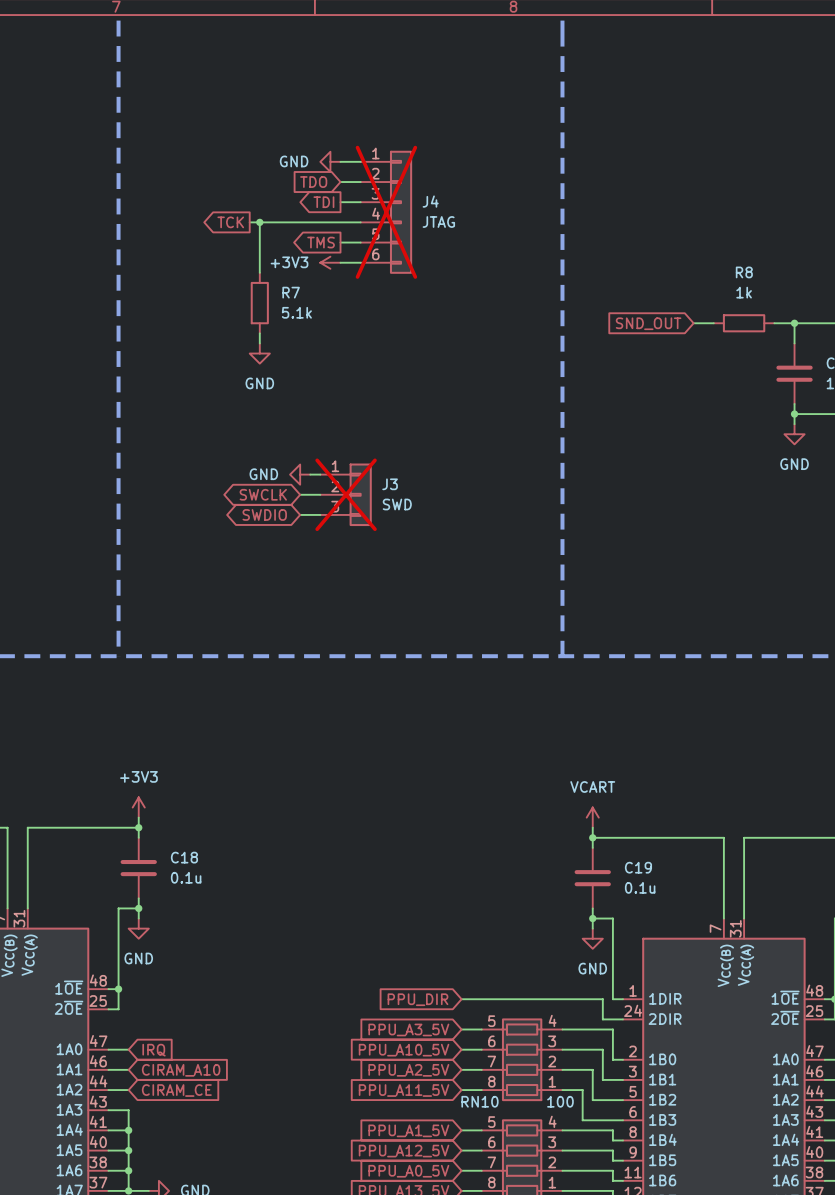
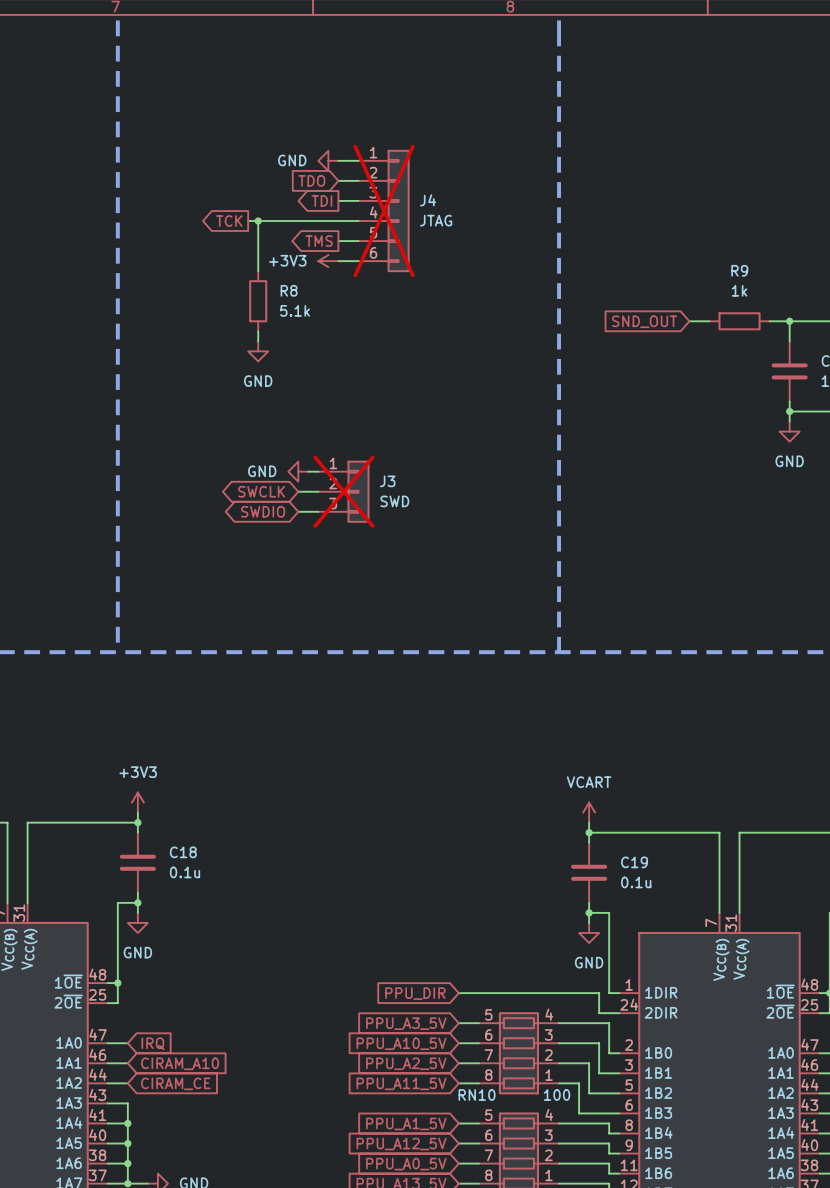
R8 name: R8 (744, 272) -> R9 (739, 270)
R7 name: R7 (291, 292) -> R8 (289, 290)

